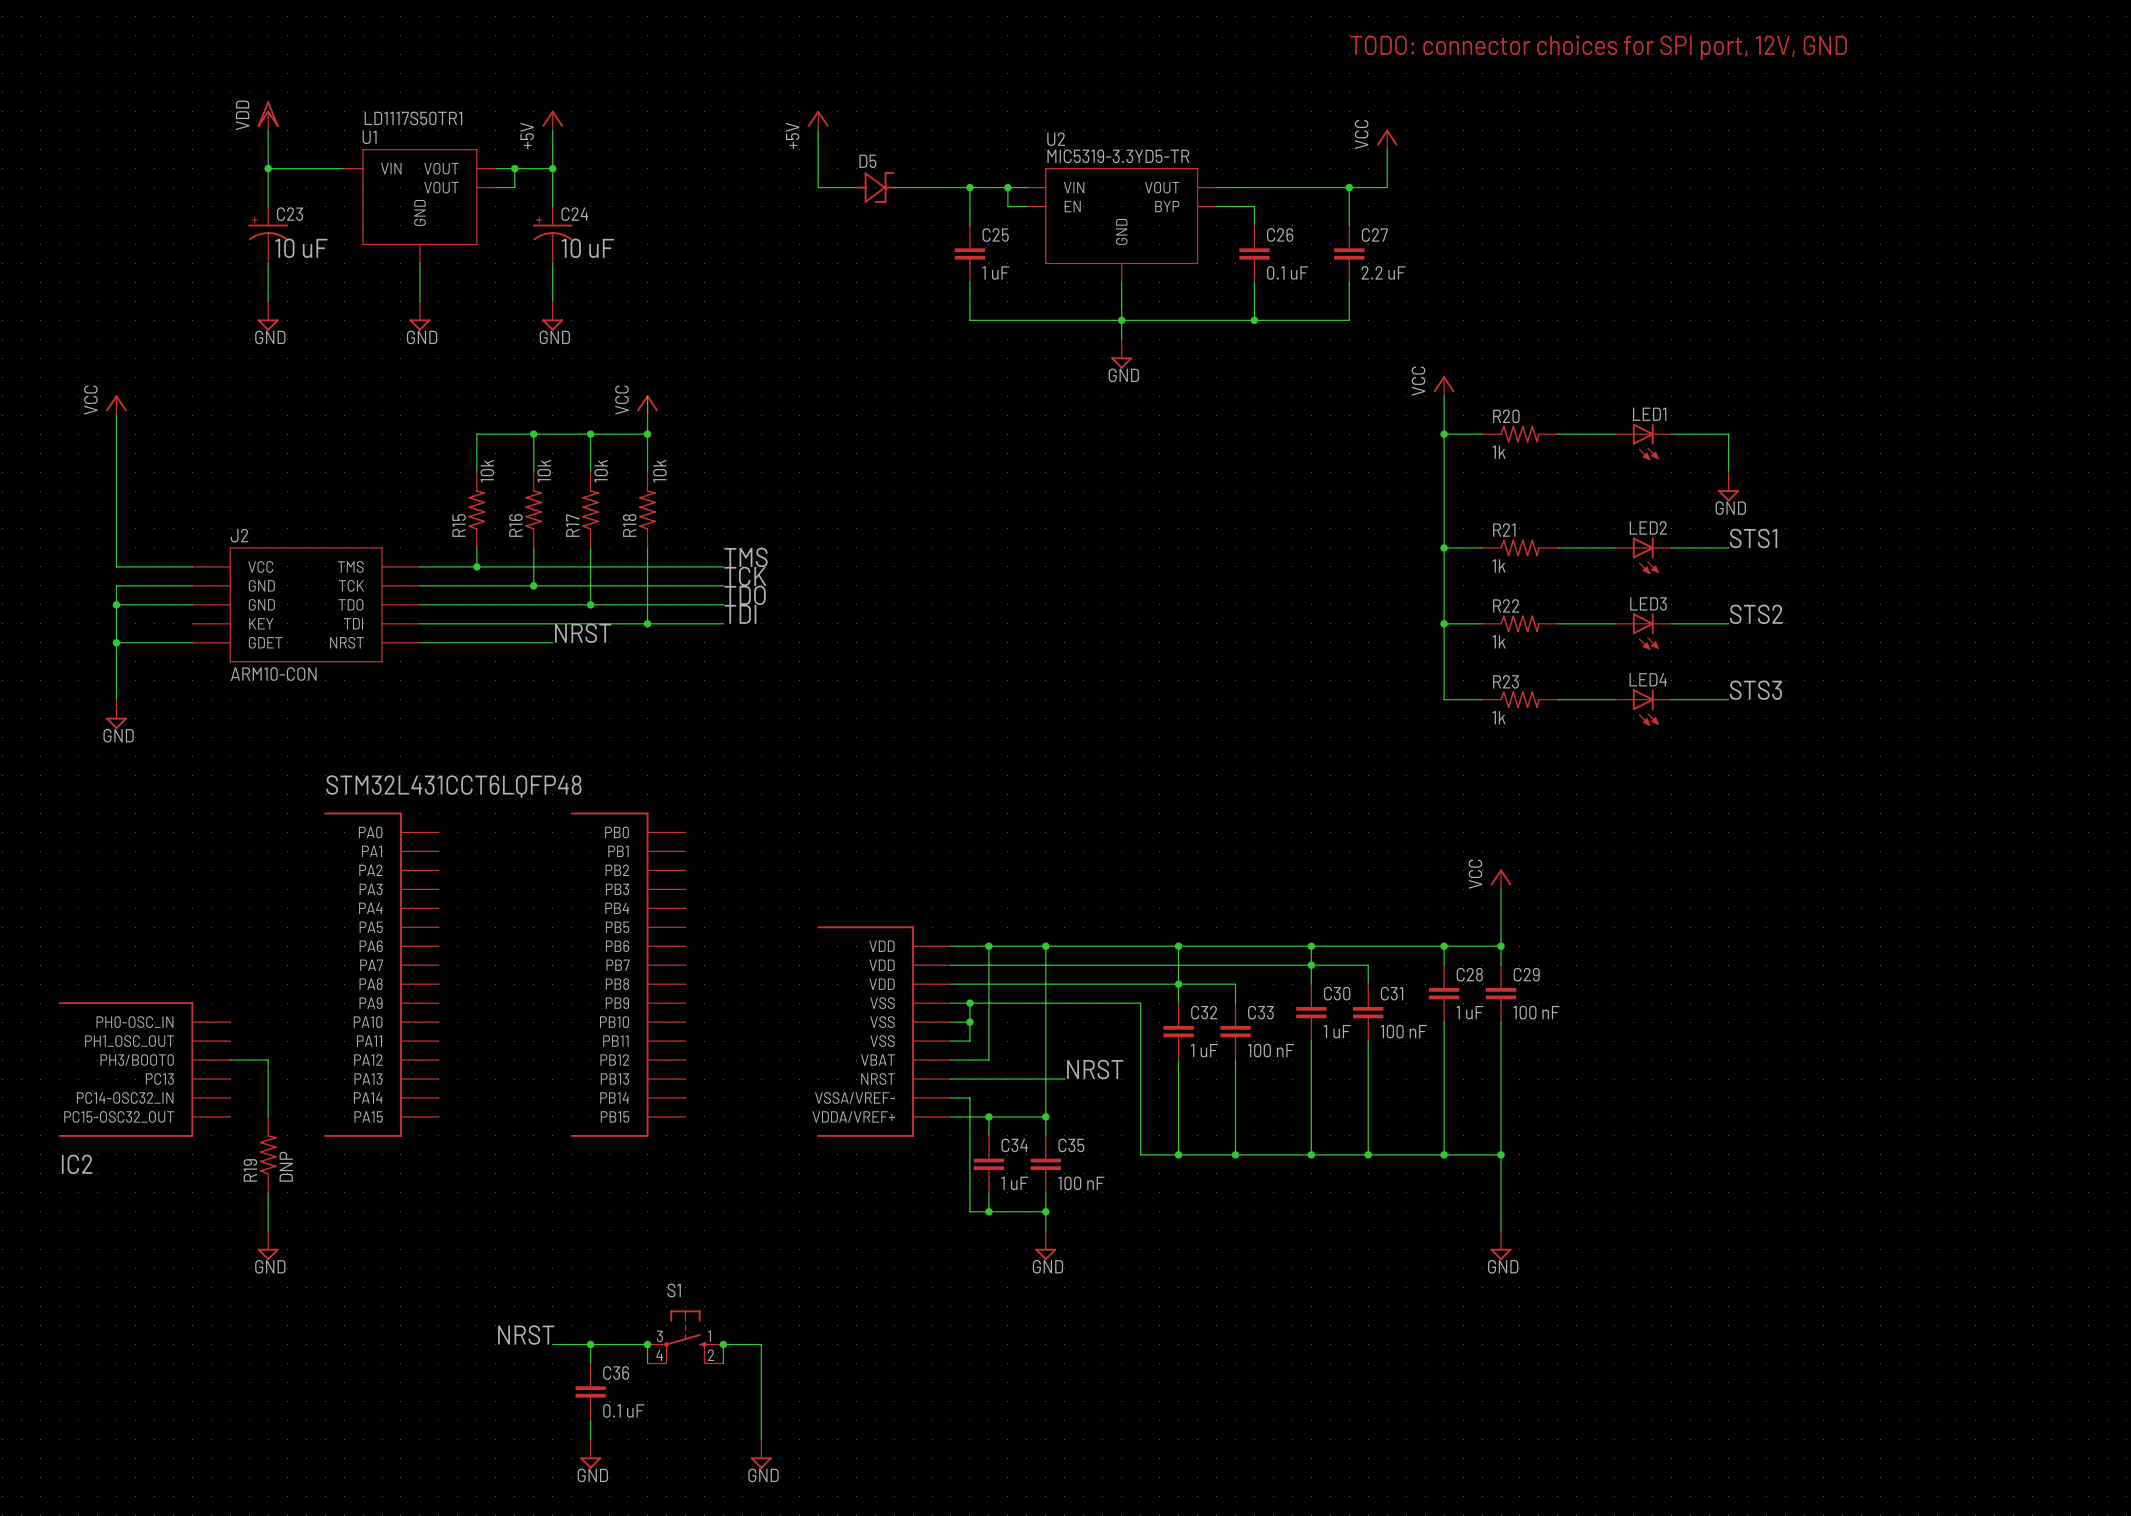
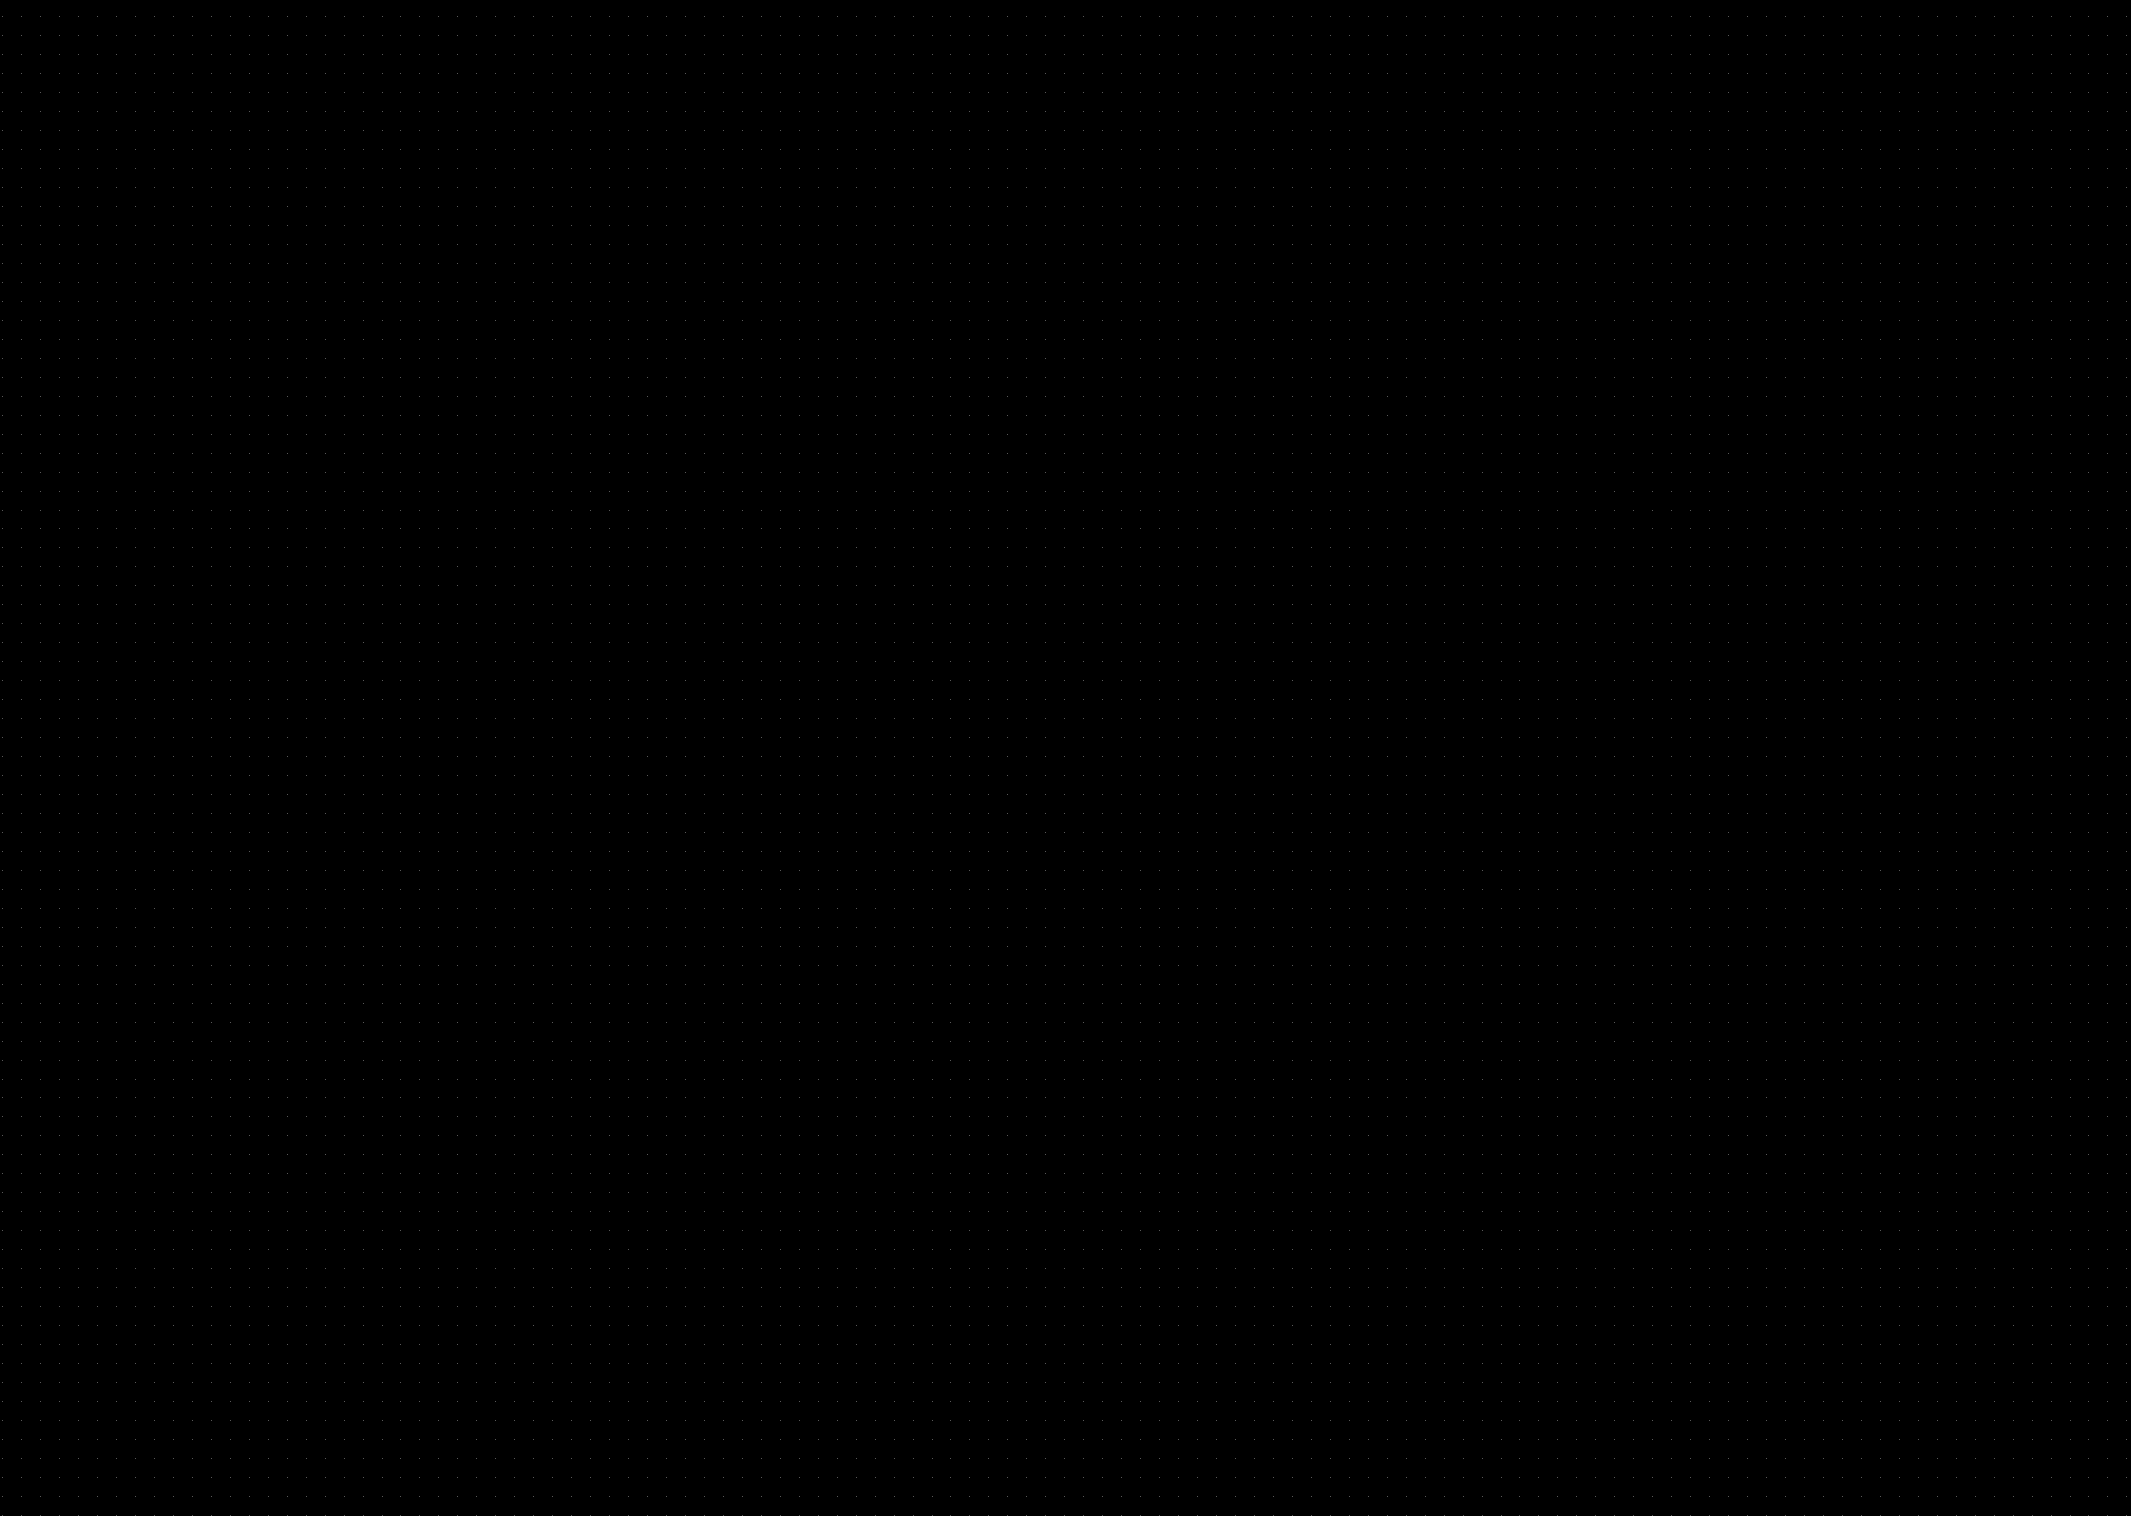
text: TODO: connector choices for SPI port, 12V, GND (1598, 47) -> none
power symbol: VDD (268, 115) -> none
power symbol: +5V (552, 120) -> none
power symbol: +5V (818, 120) -> none
wire: (268, 130) (268, 206) -> none
wire: (552, 130) (552, 206) -> none
wire: (818, 130) (818, 187) (856, 187) -> none
power symbol: VCC (1387, 139) -> none
wire: (1387, 149) (1387, 187) (1216, 187) -> none
wire: (268, 168) (344, 168) -> none
junction: (268, 168) -> none
wire: (495, 168) (552, 168) -> none
wire: (514, 168) (514, 187) (495, 187) -> none
junction: (514, 168) -> none
junction: (552, 168) -> none
D5: (875, 187) -> none
wire: (894, 187) (1026, 187) -> none
wire: (969, 187) (969, 225) -> none
junction: (969, 187) -> none
wire: (1007, 187) (1007, 206) (1026, 206) -> none
junction: (1007, 187) -> none
wire: (1349, 187) (1349, 225) -> none
junction: (1349, 187) -> none
U1: LD1117S50TR1 (419, 206) -> none
wire: (1216, 206) (1254, 206) (1254, 225) -> none
U2: MIC5319-3.3YD5-TR (1121, 225) -> none
C23: (268, 235) -> none
C24: (552, 235) -> none
C25: 1 uF (969, 253) -> none
C26: 0.1 uF (1254, 253) -> none
C27: 2.2 uF (1349, 253) -> none
wire: (268, 263) (268, 301) -> none
wire: (419, 263) (419, 301) -> none
wire: (552, 263) (552, 301) -> none
wire: (969, 282) (969, 320) (1349, 320) (1349, 282) -> none
wire: (1121, 282) (1121, 339) -> none
wire: (1254, 282) (1254, 320) -> none
power symbol: GND (268, 316) -> none
power symbol: GND (419, 316) -> none
power symbol: GND (552, 316) -> none
junction: (1121, 320) -> none
junction: (1254, 320) -> none
power symbol: GND (1121, 354) -> none
power symbol: VCC (1444, 386) -> none
wire: (647, 396) (647, 472) -> none
wire: (1444, 396) (1444, 699) (1482, 699) -> none
power symbol: VCC (116, 405) -> none
power symbol: VCC (647, 405) -> none
wire: (116, 415) (116, 566) (192, 566) -> none
wire: (533, 434) (533, 472) -> none
junction: (533, 434) -> none
wire: (590, 434) (590, 472) -> none
junction: (590, 434) -> none
wire: (647, 434) (476, 434) (476, 472) -> none
junction: (647, 434) -> none
wire: (1444, 434) (1482, 434) -> none
junction: (1444, 434) -> none
R20: 1k (1519, 434) -> none
wire: (1557, 434) (1614, 434) -> none
wire: (1671, 434) (1728, 434) (1728, 472) -> none
LED1: (1643, 442) -> none
power symbol: GND (1728, 486) -> none
R15: 10k (476, 510) -> none
R16: 10k (533, 510) -> none
R17: 10k (590, 510) -> none
R18: 10k (647, 510) -> none
label: STS1 (1753, 538) -> none
wire: (476, 547) (476, 566) -> none
wire: (533, 547) (533, 585) -> none
wire: (590, 547) (590, 604) -> none
wire: (647, 547) (647, 623) -> none
wire: (1444, 547) (1482, 547) -> none
junction: (1444, 547) -> none
R21: 1k (1519, 547) -> none
wire: (1557, 547) (1614, 547) -> none
wire: (1671, 547) (1728, 547) -> none
LED2: (1643, 555) -> none
label: TMS (746, 557) -> none
wire: (419, 566) (723, 566) -> none
junction: (476, 566) -> none
label: TCK (745, 576) -> none
wire: (192, 585) (116, 585) (116, 699) -> none
wire: (419, 585) (723, 585) -> none
junction: (533, 585) -> none
label: TDO (745, 595) -> none
wire: (116, 604) (192, 604) -> none
junction: (116, 604) -> none
J2: ARM10-CON (306, 604) -> none
wire: (419, 604) (723, 604) -> none
junction: (590, 604) -> none
label: TDI (740, 614) -> none
label: STS2 (1756, 614) -> none
wire: (419, 623) (723, 623) -> none
junction: (647, 623) -> none
wire: (1444, 623) (1482, 623) -> none
junction: (1444, 623) -> none
R22: 1k (1519, 623) -> none
wire: (1557, 623) (1614, 623) -> none
wire: (1671, 623) (1728, 623) -> none
LED3: (1643, 631) -> none
label: NRST (583, 633) -> none
wire: (116, 642) (192, 642) -> none
junction: (116, 642) -> none
wire: (419, 642) (552, 642) -> none
label: STS3 (1755, 690) -> none
R23: 1k (1519, 699) -> none
wire: (1557, 699) (1614, 699) -> none
wire: (1671, 699) (1728, 699) -> none
LED4: (1643, 707) -> none
power symbol: GND (116, 714) -> none
power symbol: VCC (1501, 879) -> none
wire: (1501, 889) (1501, 965) -> none
wire: (950, 946) (1501, 946) -> none
wire: (988, 946) (988, 1060) (950, 1060) -> none
junction: (988, 946) -> none
wire: (1045, 946) (1045, 1135) -> none
junction: (1045, 946) -> none
wire: (1178, 946) (1178, 1003) -> none
junction: (1178, 946) -> none
wire: (1311, 946) (1311, 984) -> none
junction: (1311, 946) -> none
wire: (1444, 946) (1444, 965) -> none
junction: (1444, 946) -> none
junction: (1501, 946) -> none
wire: (950, 965) (1368, 965) (1368, 984) -> none
junction: (1311, 965) -> none
IC2: STM32L431CCT6LQFP48 (504, 974) -> none
wire: (950, 984) (1235, 984) (1235, 1003) -> none
junction: (1178, 984) -> none
C28: 1 uF (1444, 993) -> none
C29: 100 nF (1501, 993) -> none
wire: (950, 1003) (1140, 1003) (1140, 1154) (1501, 1154) -> none
wire: (969, 1003) (969, 1041) (950, 1041) -> none
junction: (969, 1003) -> none
C30: 1 uF (1311, 1012) -> none
C31: 100 nF (1368, 1012) -> none
wire: (950, 1022) (969, 1022) -> none
junction: (969, 1022) -> none
wire: (1444, 1022) (1444, 1154) -> none
wire: (1501, 1022) (1501, 1230) -> none
C32: 1 uF (1178, 1031) -> none
C33: 100 nF (1235, 1031) -> none
wire: (1311, 1041) (1311, 1154) -> none
wire: (1368, 1041) (1368, 1154) -> none
wire: (230, 1060) (268, 1060) (268, 1116) -> none
wire: (1178, 1060) (1178, 1154) -> none
wire: (1235, 1060) (1235, 1154) -> none
label: NRST (1095, 1069) -> none
wire: (950, 1079) (1064, 1079) -> none
wire: (950, 1097) (969, 1097) (969, 1211) (1045, 1211) -> none
wire: (950, 1116) (1045, 1116) -> none
wire: (988, 1116) (988, 1135) -> none
junction: (988, 1116) -> none
junction: (1045, 1116) -> none
R19: DNP (268, 1154) -> none
junction: (1178, 1154) -> none
junction: (1235, 1154) -> none
junction: (1311, 1154) -> none
junction: (1368, 1154) -> none
junction: (1444, 1154) -> none
junction: (1501, 1154) -> none
C34: 1 uF (988, 1164) -> none
C35: 100 nF (1045, 1164) -> none
wire: (268, 1192) (268, 1230) -> none
wire: (988, 1192) (988, 1211) -> none
wire: (1045, 1192) (1045, 1230) -> none
junction: (988, 1211) -> none
junction: (1045, 1211) -> none
power symbol: GND (268, 1245) -> none
power symbol: GND (1045, 1245) -> none
power symbol: GND (1501, 1245) -> none
label: NRST (526, 1335) -> none
S1: (685, 1337) -> none
wire: (552, 1344) (647, 1344) (647, 1363) -> none
wire: (590, 1344) (590, 1363) -> none
junction: (590, 1344) -> none
junction: (647, 1344) -> none
junction: (723, 1344) -> none
wire: (723, 1363) (723, 1344) (761, 1344) (761, 1439) -> none
C36: 0.1 uF (590, 1391) -> none
wire: (590, 1420) (590, 1439) -> none
power symbol: GND (590, 1454) -> none
power symbol: GND (761, 1454) -> none

